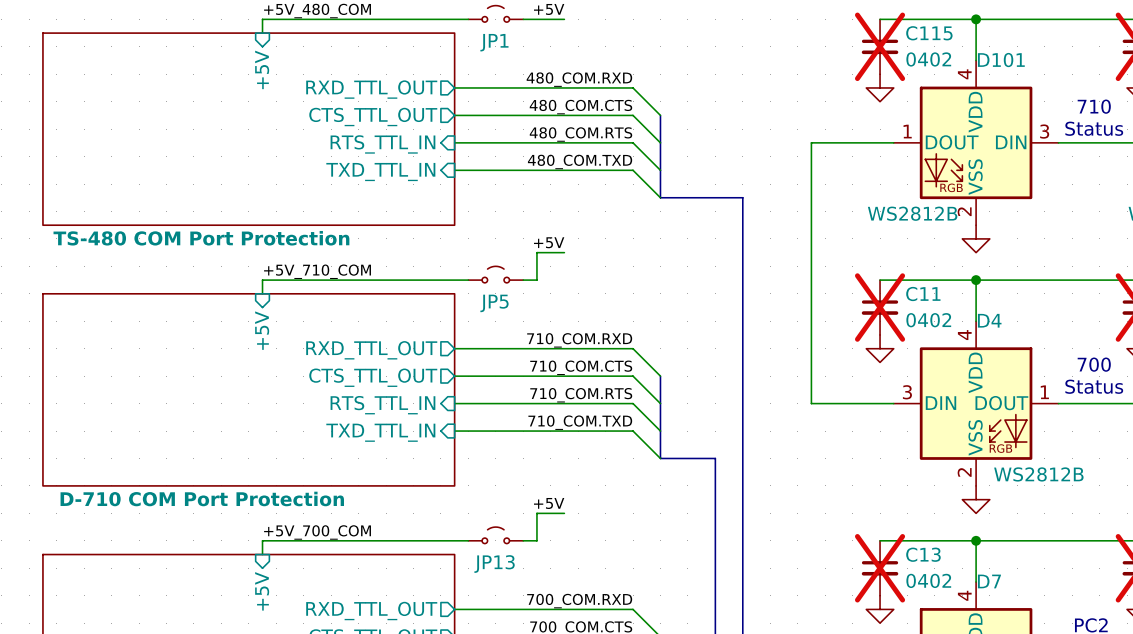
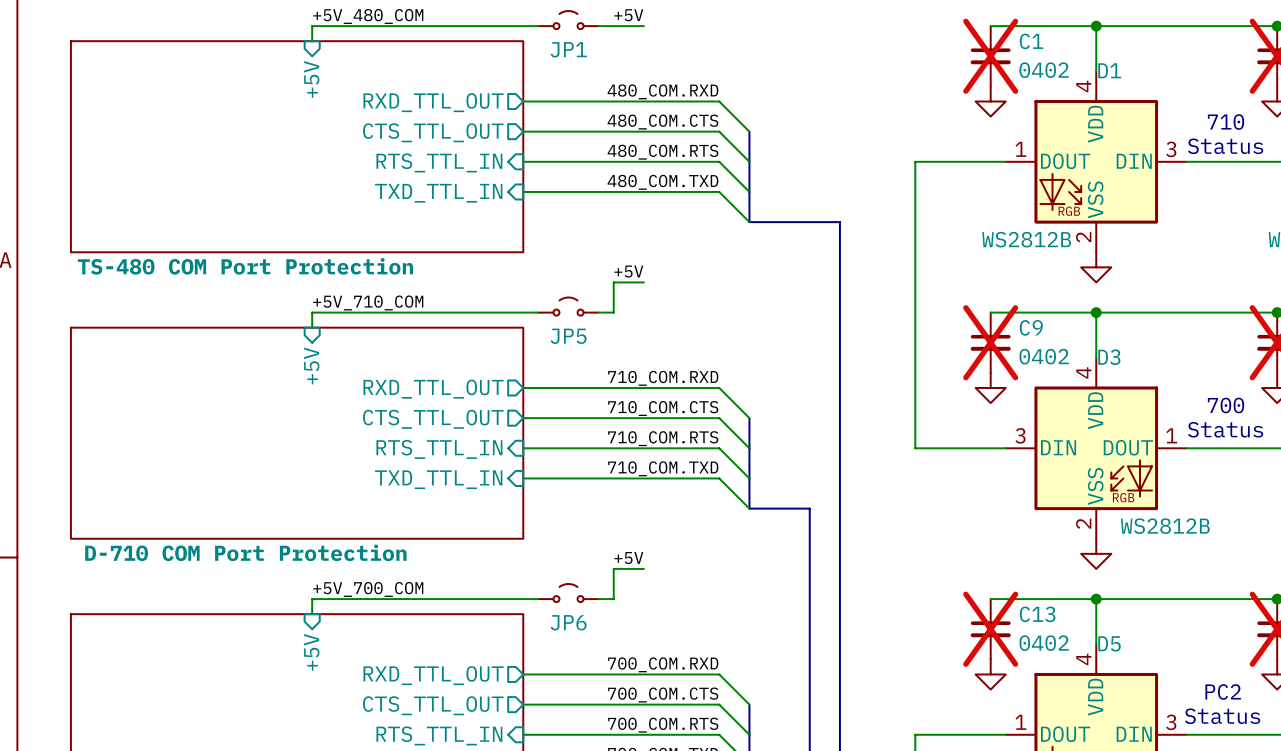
C115 name: C115 (929, 33) -> C1 (1031, 41)
D101 name: D101 (1001, 60) -> D1 (1109, 70)
C11 name: C11 (923, 294) -> C9 (1031, 327)
D4 name: D4 (989, 320) -> D3 (1109, 357)
JP13 name: JP13 (494, 564) -> JP6 (568, 622)
D7 name: D7 (989, 581) -> D5 (1109, 643)

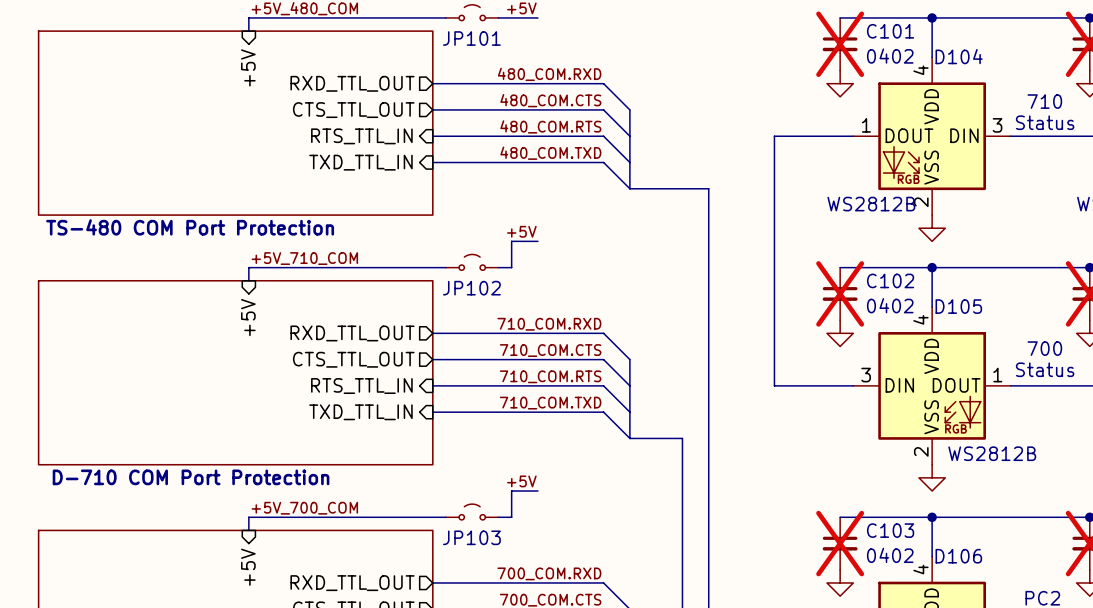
C1 name: C1 (1031, 41) -> C101 (890, 31)
JP1 name: JP1 (568, 49) -> JP101 (471, 38)
D1 name: D1 (1109, 70) -> D104 (959, 56)
C9 name: C9 (1031, 327) -> C102 (890, 280)
JP5 name: JP5 (568, 336) -> JP102 (471, 288)
D3 name: D3 (1109, 357) -> D105 (958, 306)
C13 name: C13 (1037, 614) -> C103 (890, 530)
JP6 name: JP6 (568, 622) -> JP103 (471, 537)
D5 name: D5 (1109, 643) -> D106 (958, 556)

